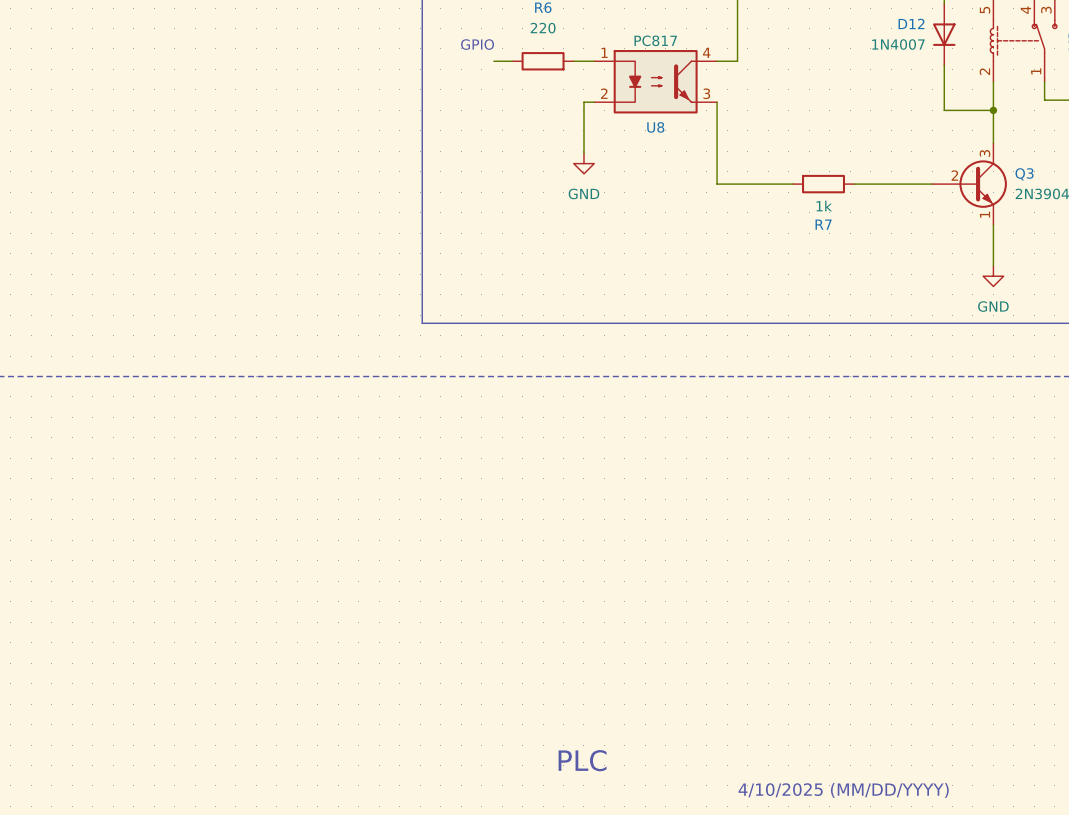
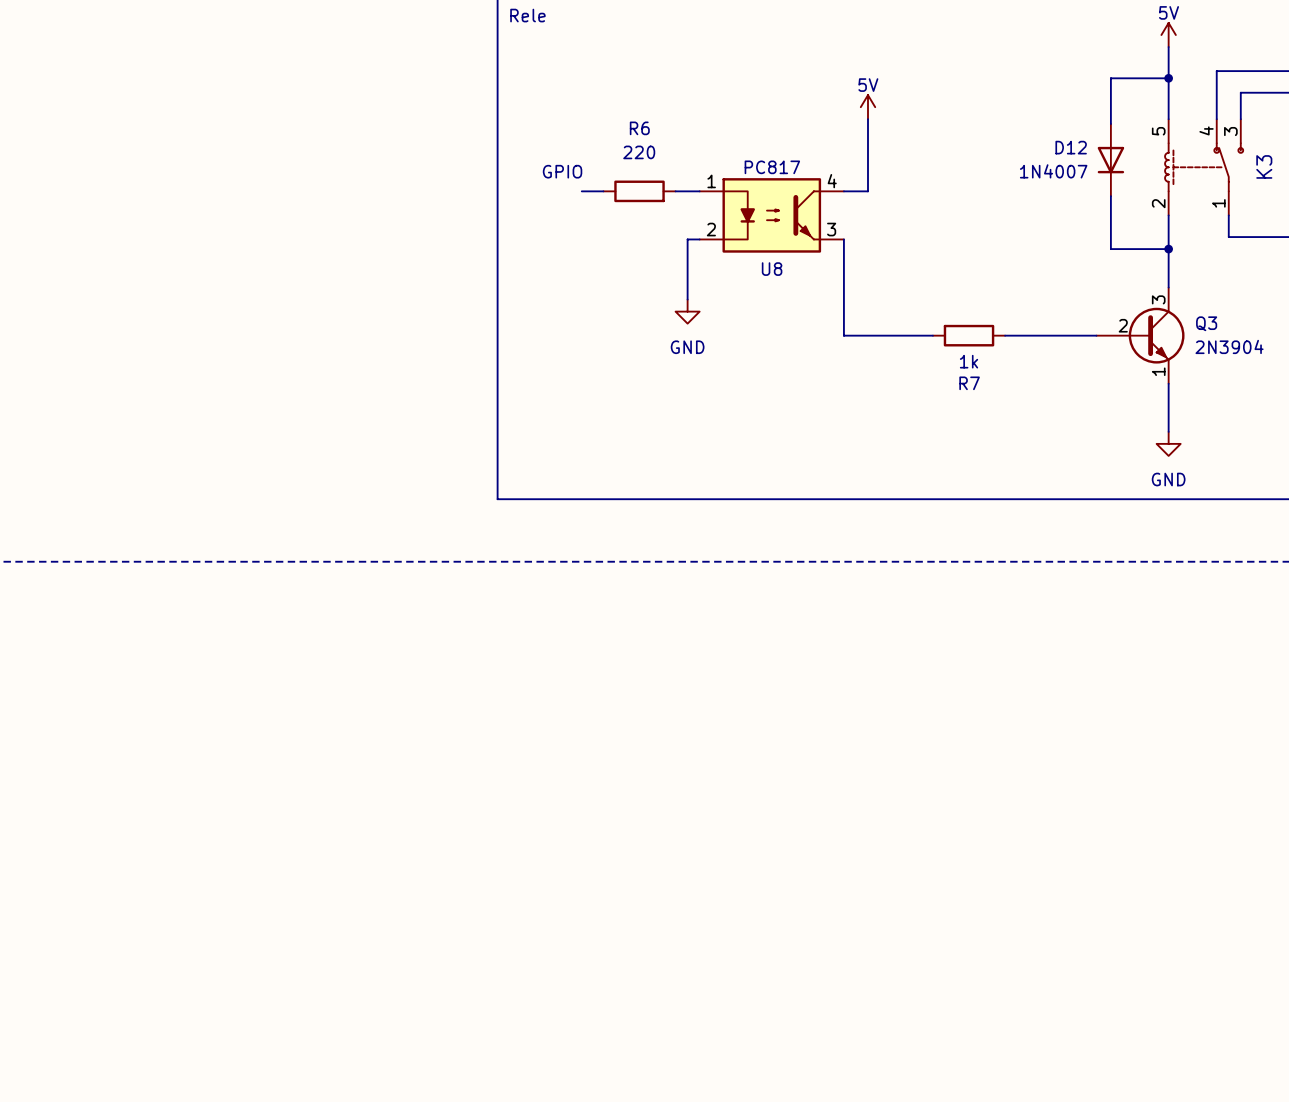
text: PLC (582, 760) -> none
text: 4/10/2025 (MM/DD/YYYY) (843, 790) -> none

